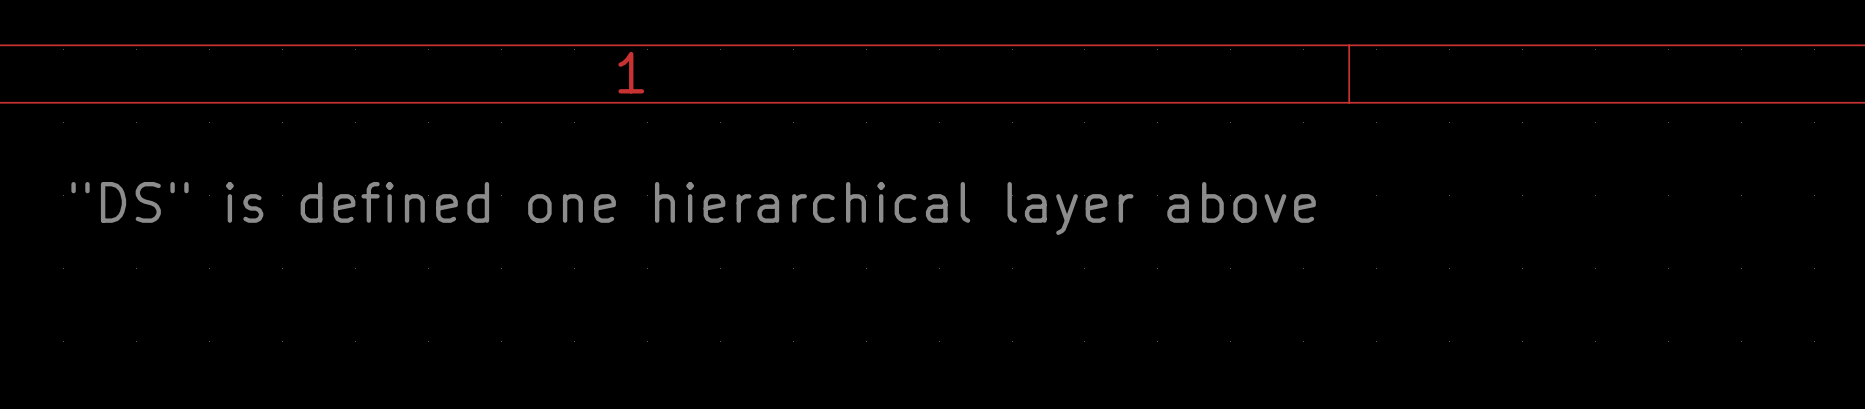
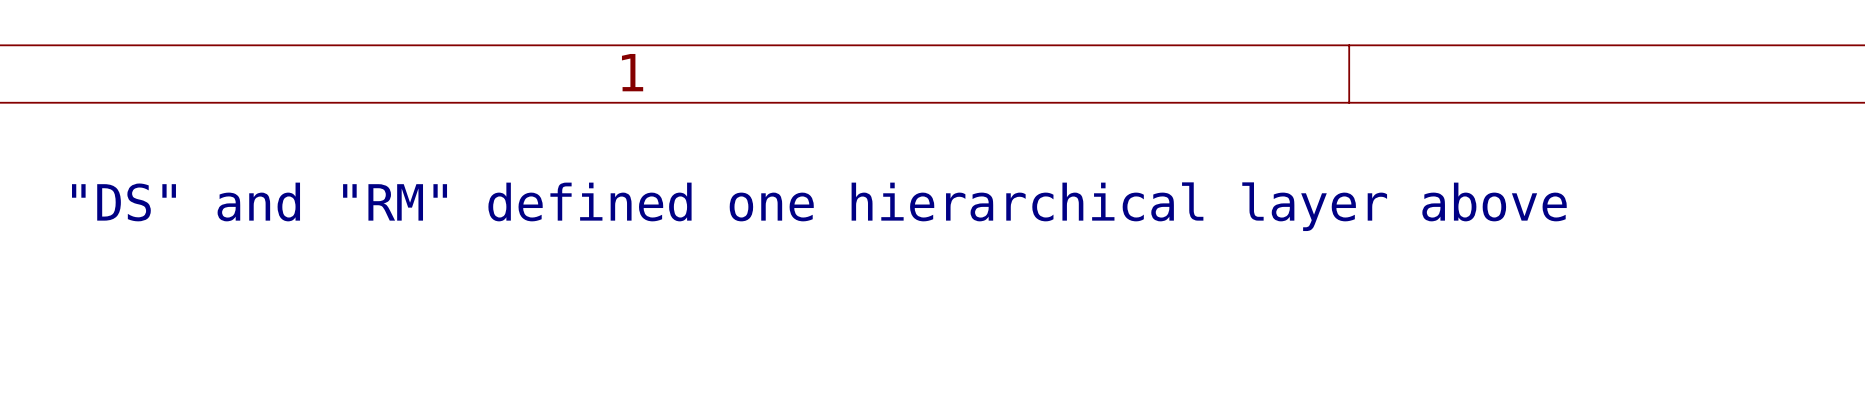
text: "DS" is defined one hierarchical layer above (693, 208) -> "DS" and "RM" defined one hierarchical layer above (819, 206)

